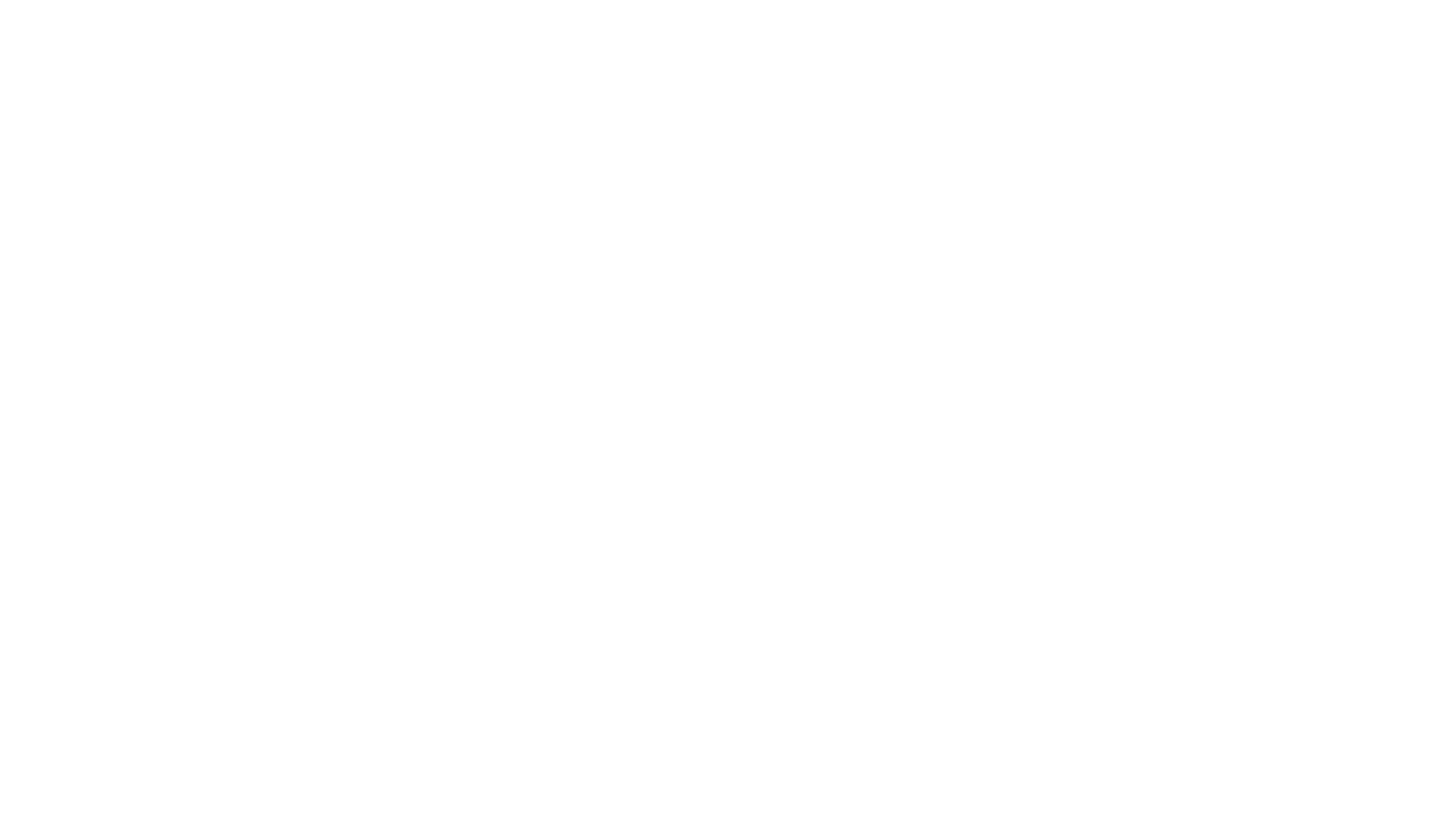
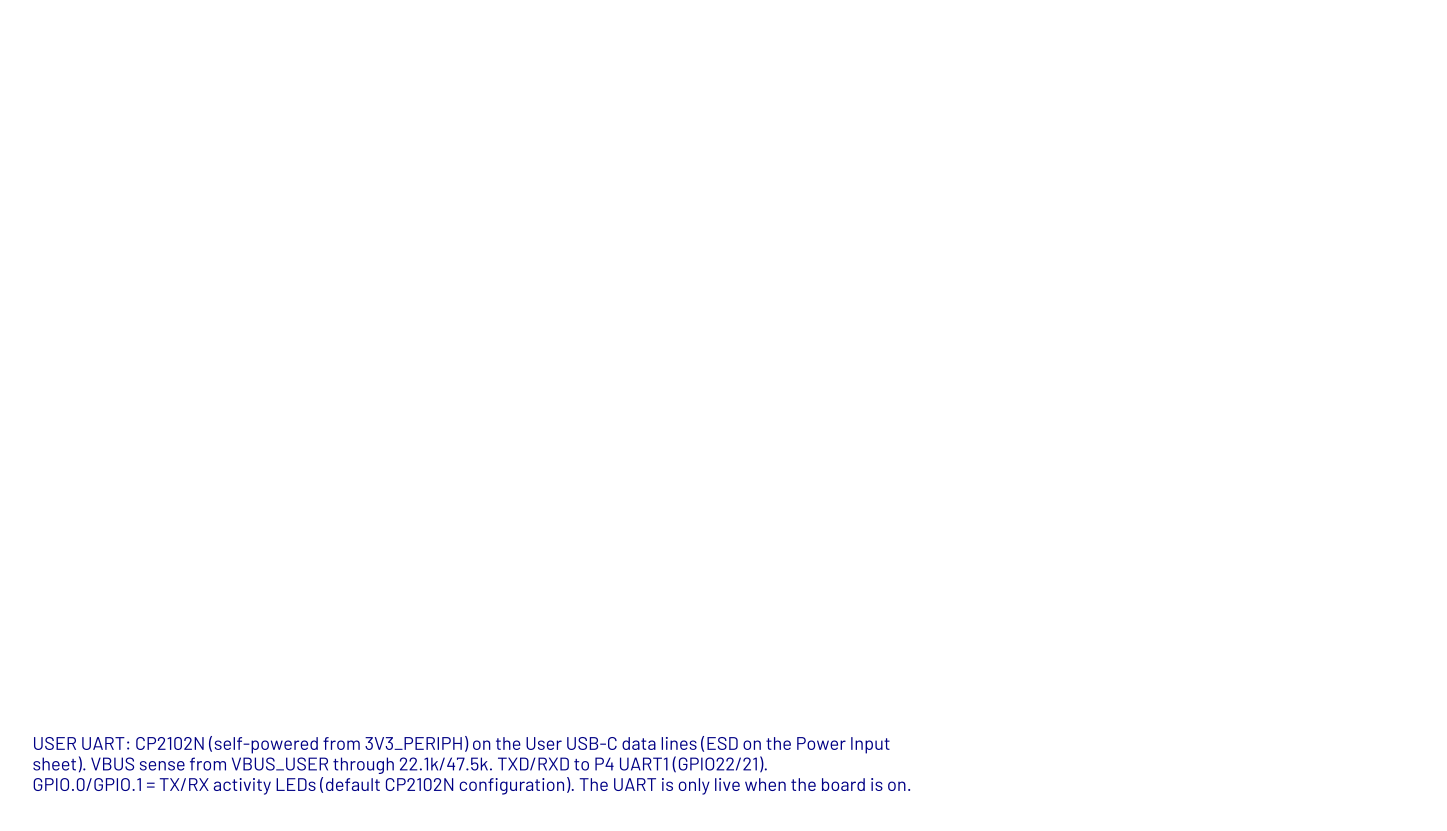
text: none -> USER UART: CP2102N (self-powered from 3V3_PERIPH) on the User USB-C data lines (ESD on the Power Input (461, 744)
text: none -> sheet). VBUS sense from VBUS_USER through 22.1k/47.5k. TXD/RXD to P4 UART1 (GPIO22/21). (400, 765)
text: none -> GPIO.0/GPIO.1 = TX/RX activity LEDs (default CP2102N configuration). The UART is only live when the board is on. (471, 785)

